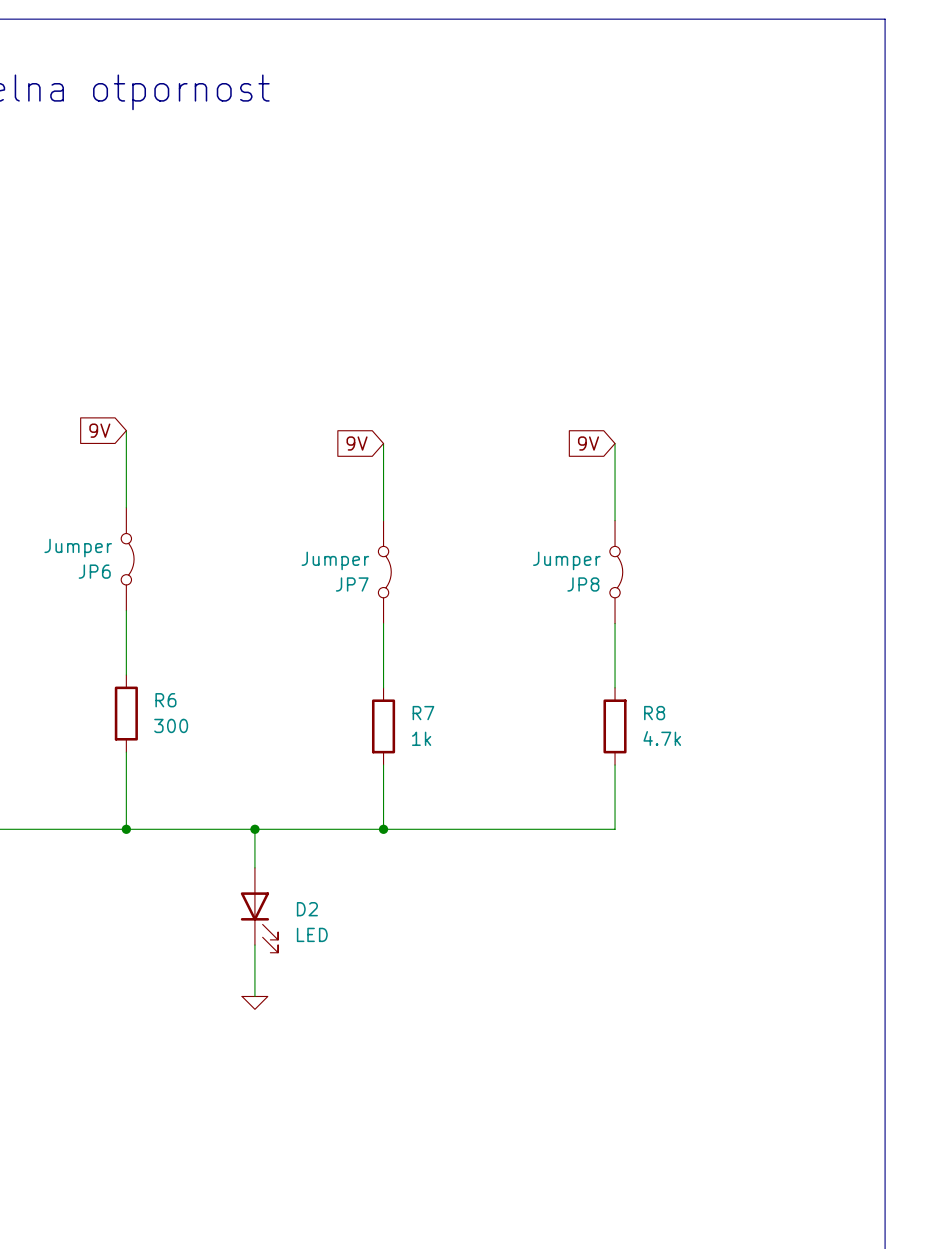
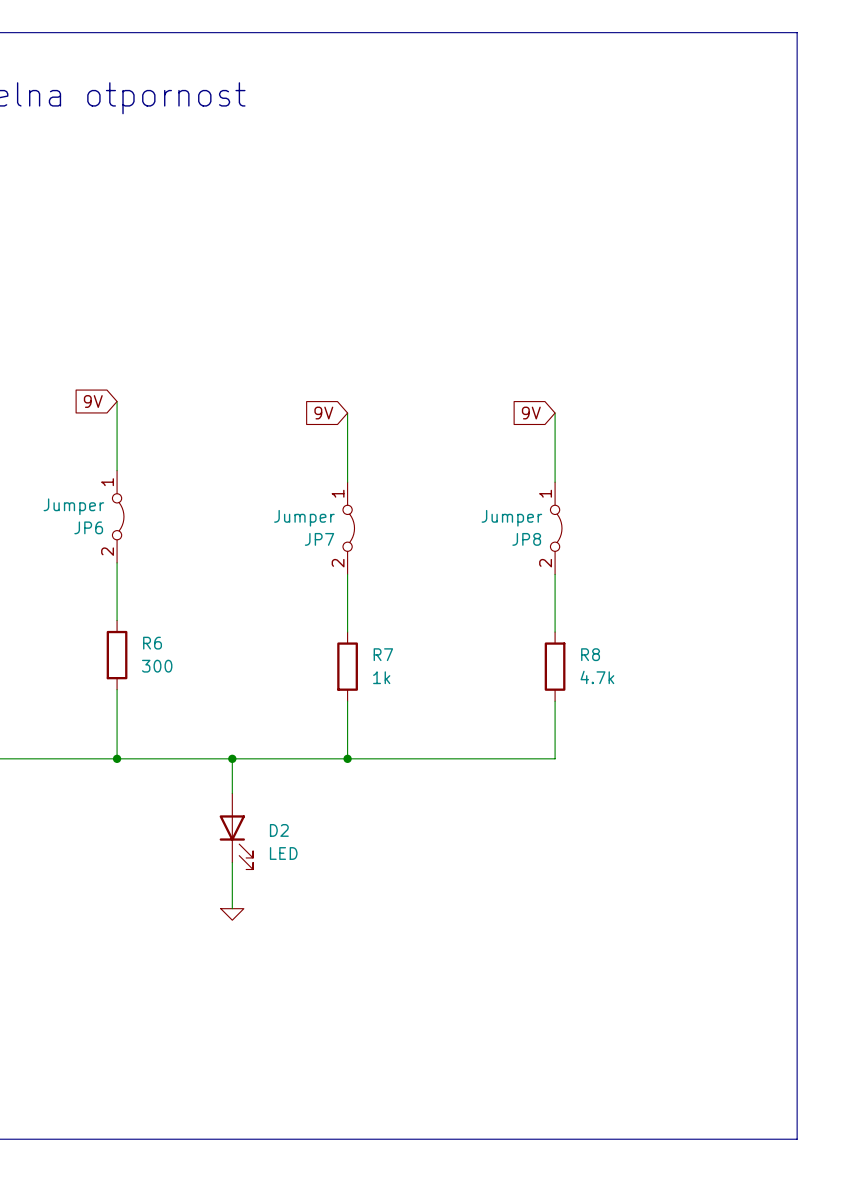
JP6 pin number: none -> 1 (107, 482)
JP7 pin number: none -> 1 (338, 493)
JP8 pin number: none -> 1 (545, 493)
JP6 pin number: none -> 2 (107, 551)
JP7 pin number: none -> 2 (338, 563)
JP8 pin number: none -> 2 (545, 563)

